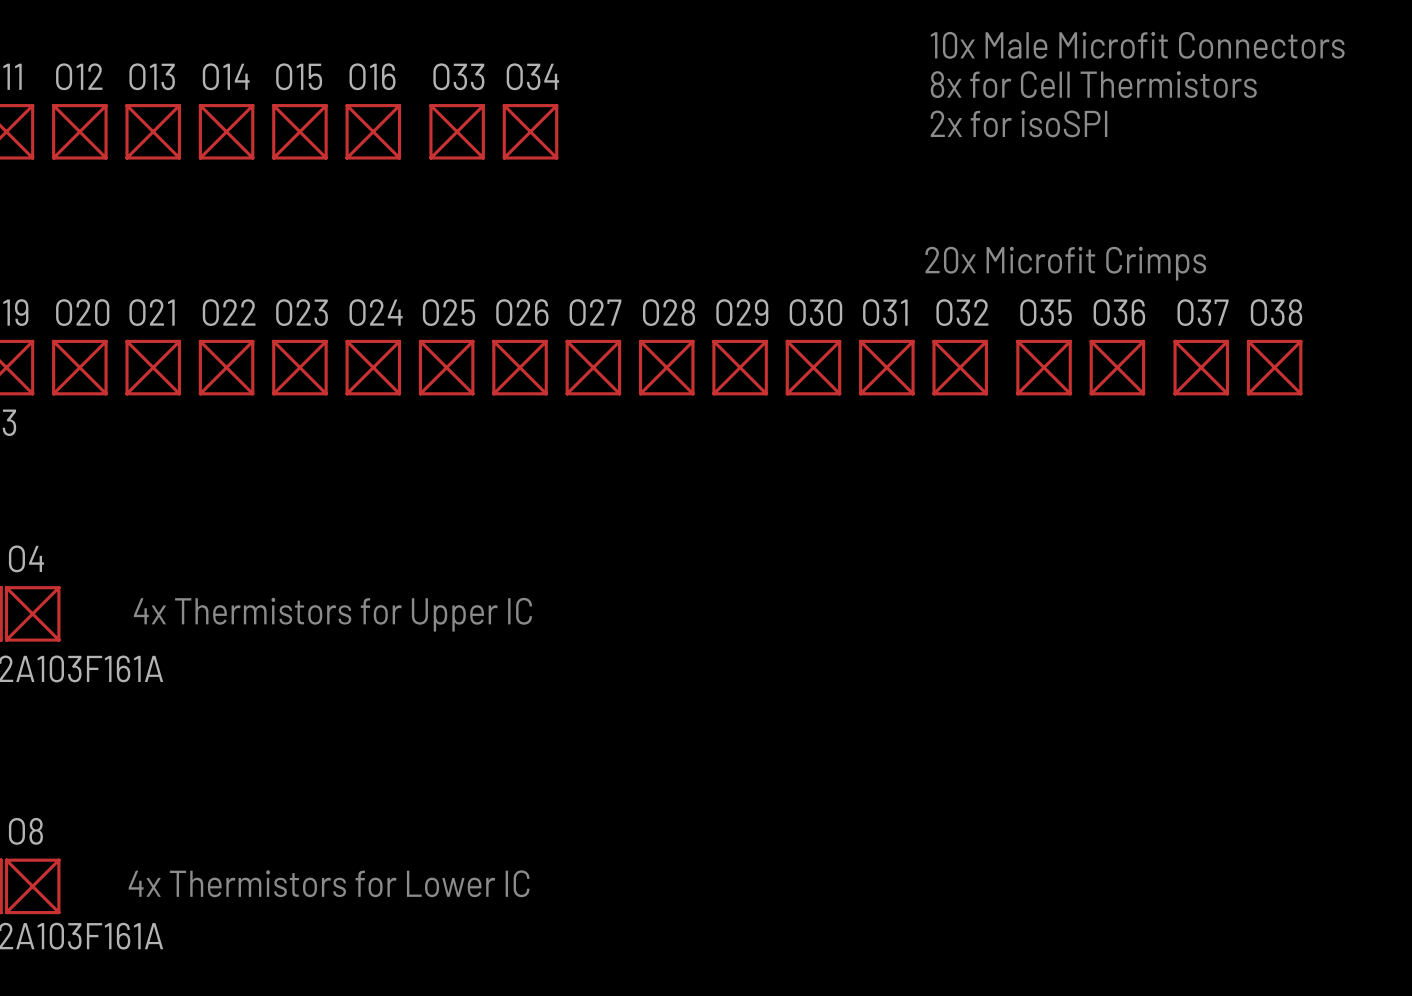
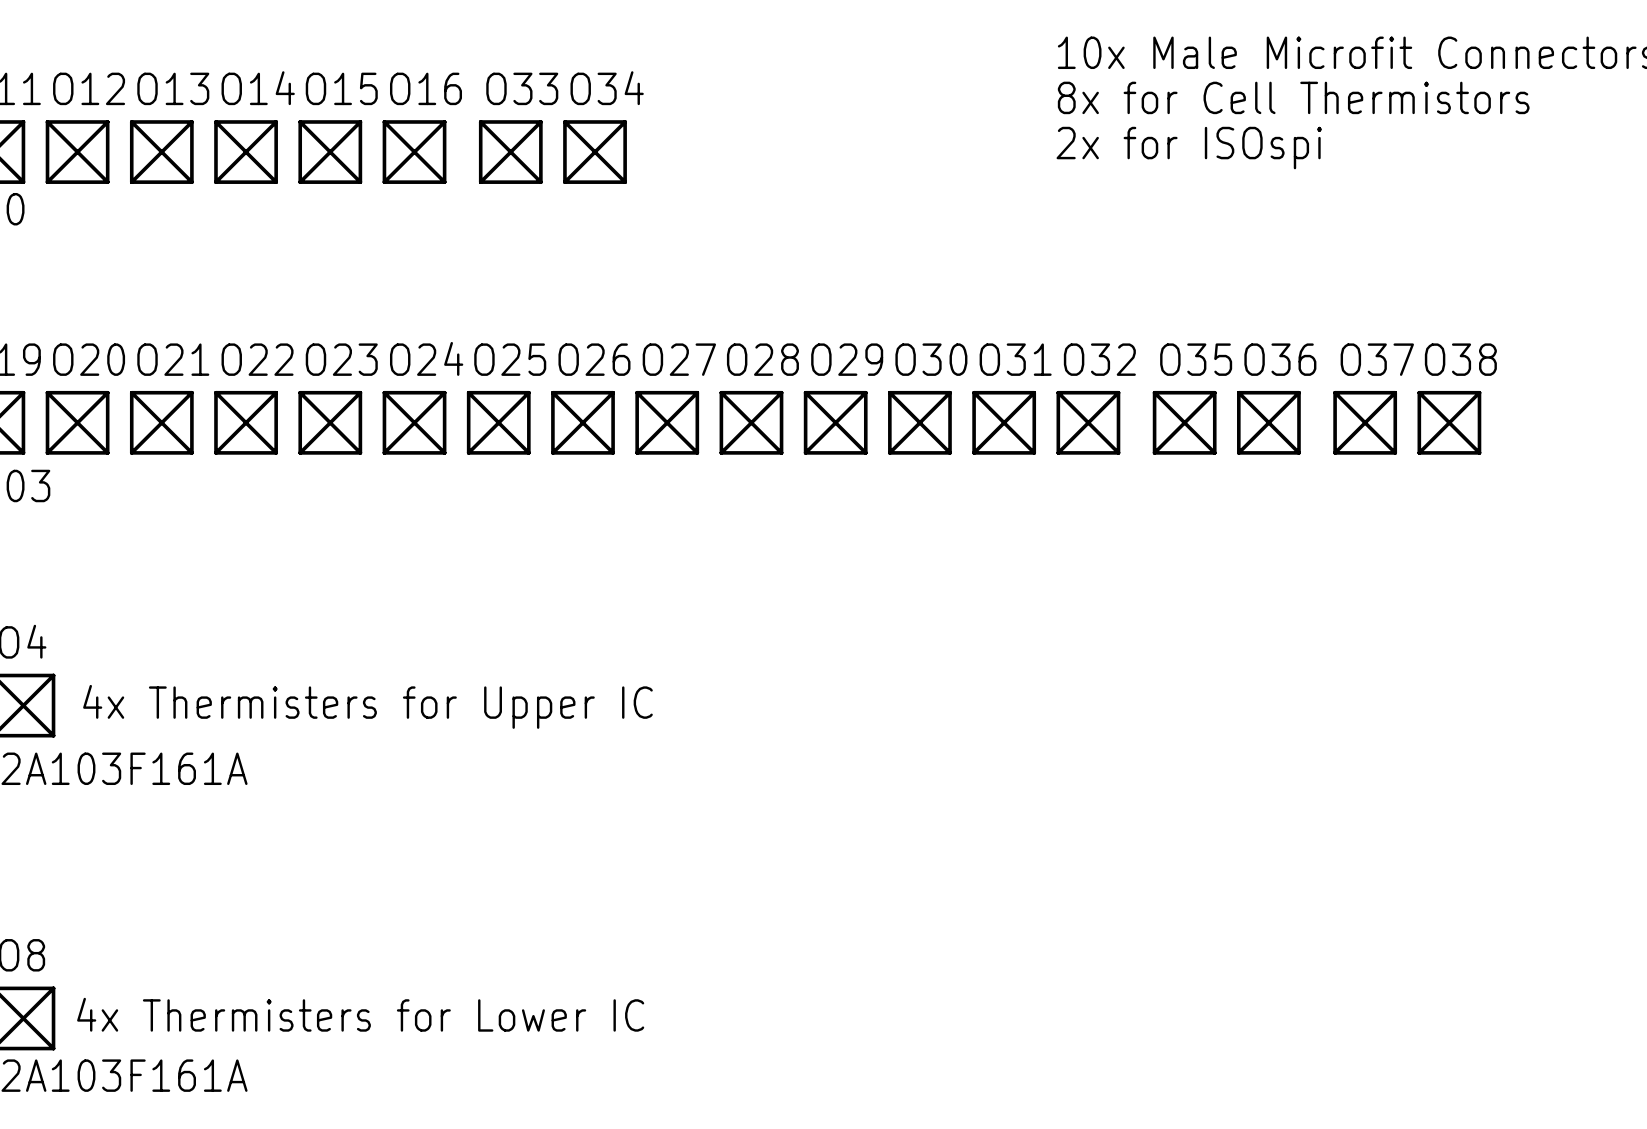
text: 2x for isoSPI (1018, 123) -> 2x for ISOspi (1189, 148)
text: 20x Microfit Crimps (1065, 263) -> none
text: 4x Thermistors for Upper IC (332, 614) -> 4x Thermisters for Upper IC (367, 706)
text: 4x Thermistors for Lower IC (329, 883) -> 4x Thermisters for Lower IC (360, 1014)

